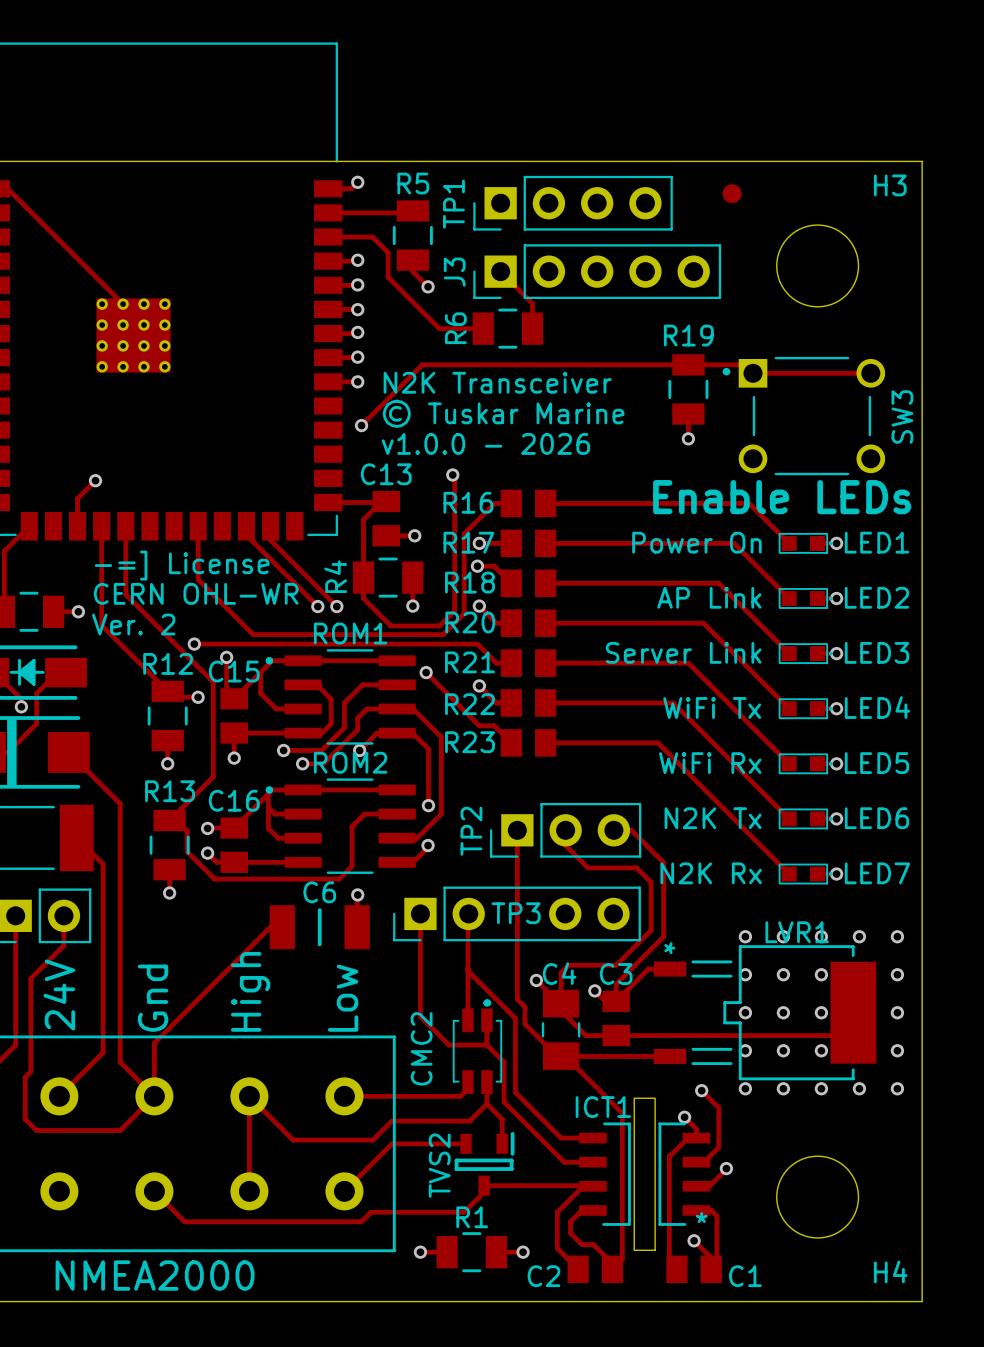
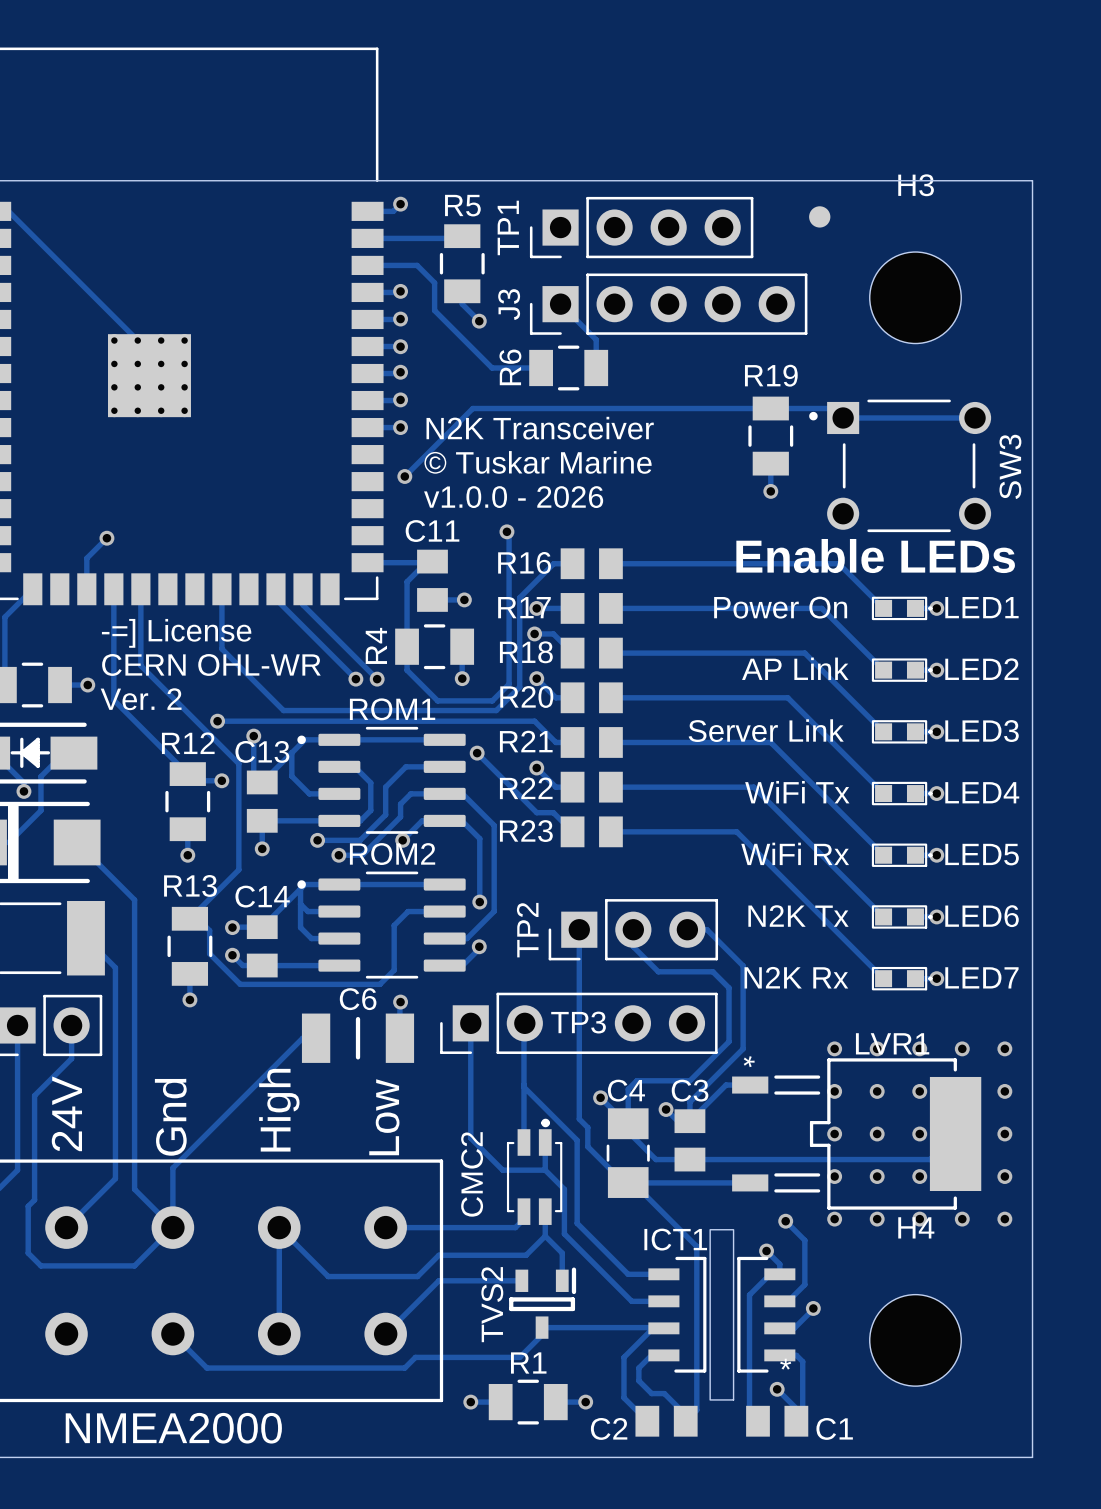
H3 name position: H3 (890, 185) -> H3 (916, 185)
C13 name: C13 (386, 474) -> C11 (432, 531)
C15 name: C15 (234, 671) -> C13 (262, 751)
C16 name: C16 (234, 800) -> C14 (262, 896)
H4 name position: H4 (890, 1271) -> H4 (916, 1227)

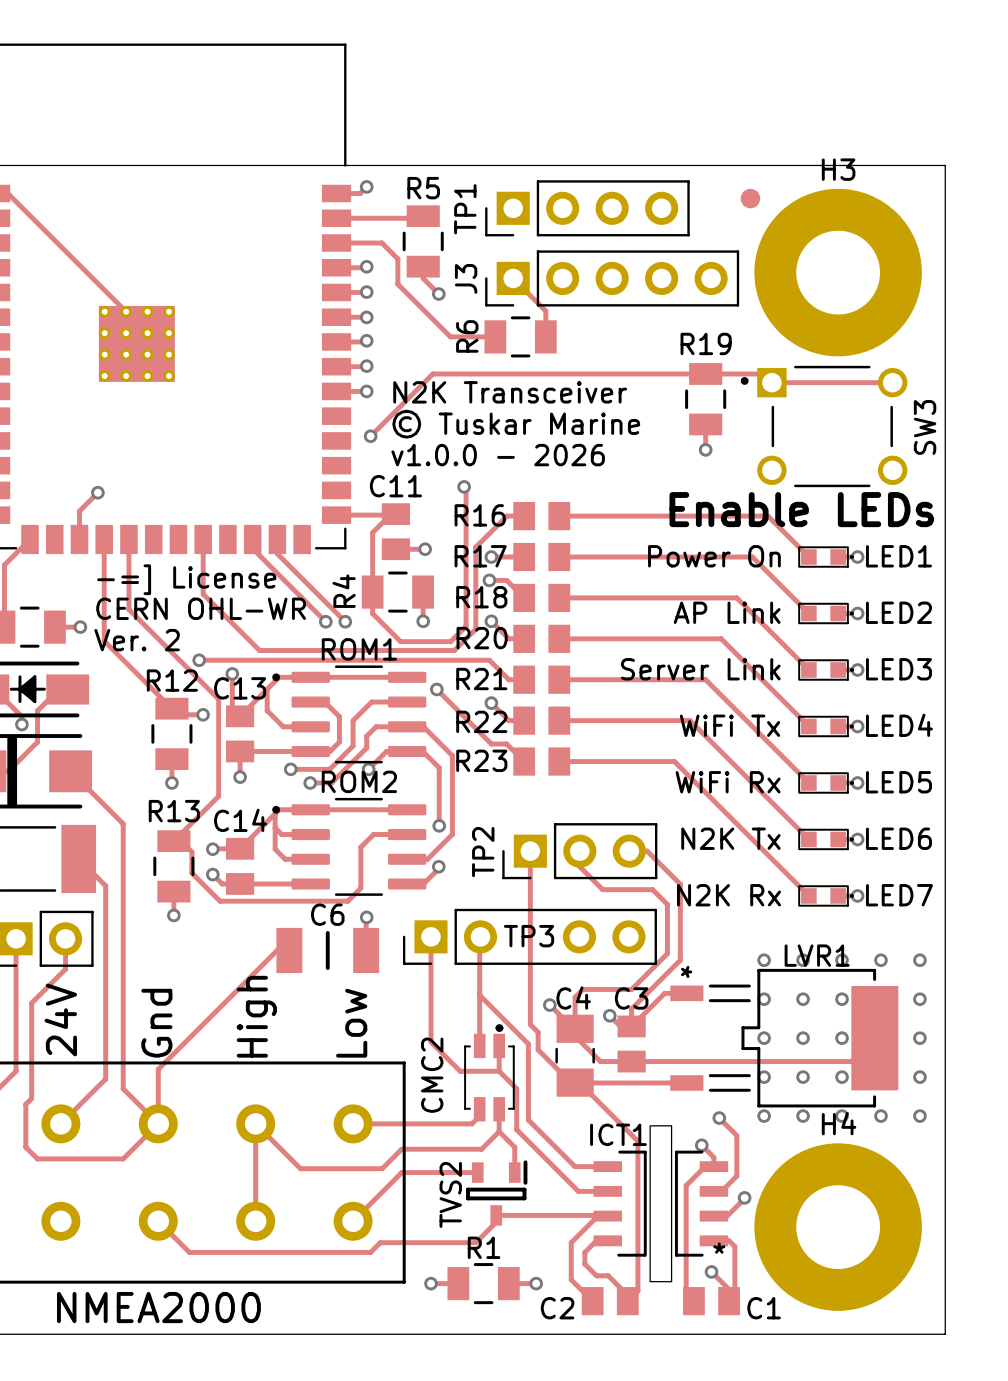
H3 footprint: [869, 252, 962, 344] -> [754, 188, 922, 357]
H4 footprint: [869, 1294, 962, 1387] -> [754, 1143, 922, 1311]

